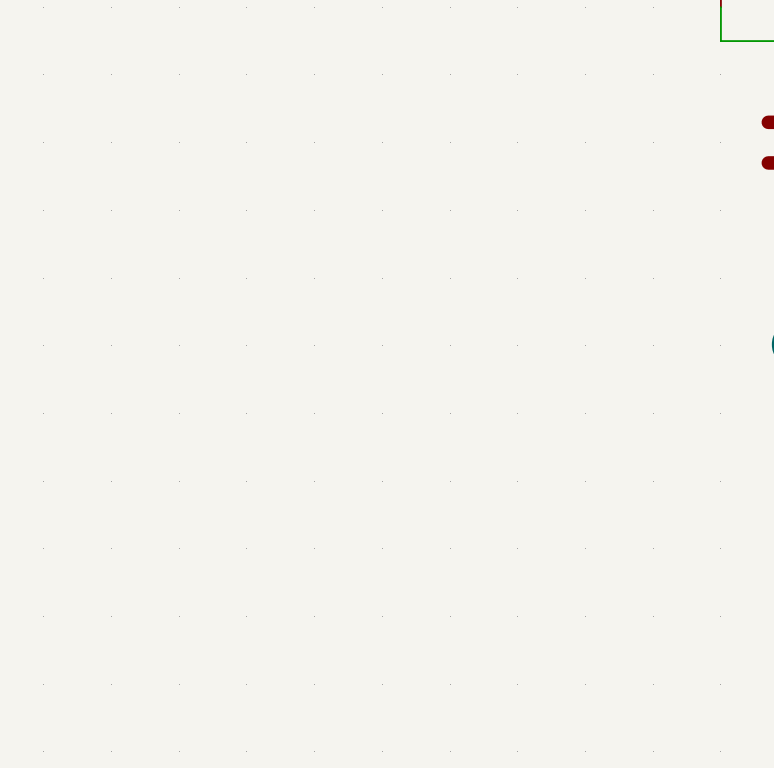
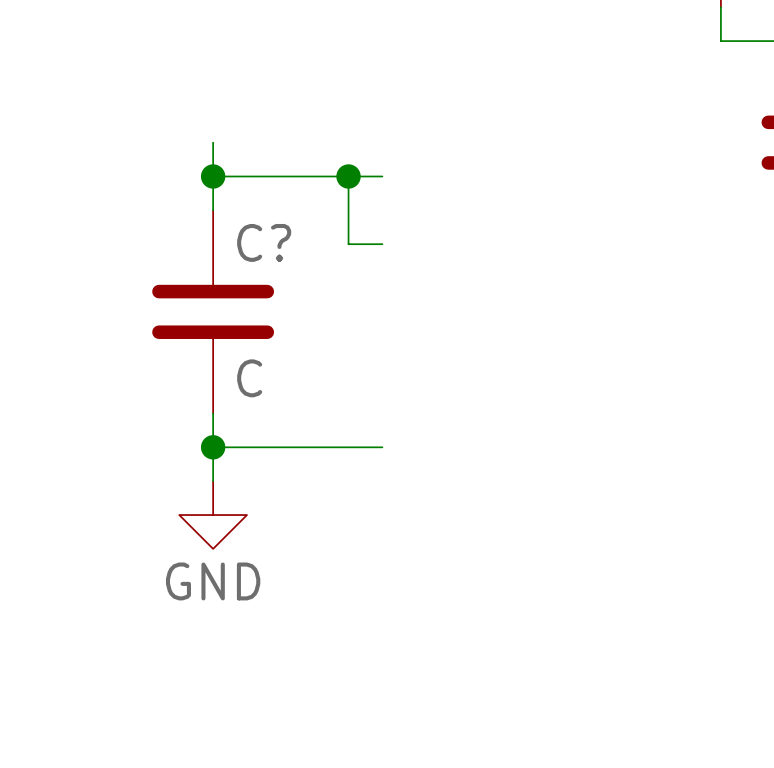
wire: none -> (213, 142) (213, 210)
wire: none -> (213, 176) (382, 176)
junction: none -> (213, 176)
wire: none -> (348, 176) (348, 244) (382, 244)
junction: none -> (348, 176)
C?: none -> C (213, 311)
wire: none -> (213, 413) (213, 481)
wire: none -> (213, 447) (382, 447)
junction: none -> (213, 447)
power symbol: none -> GND (213, 515)

